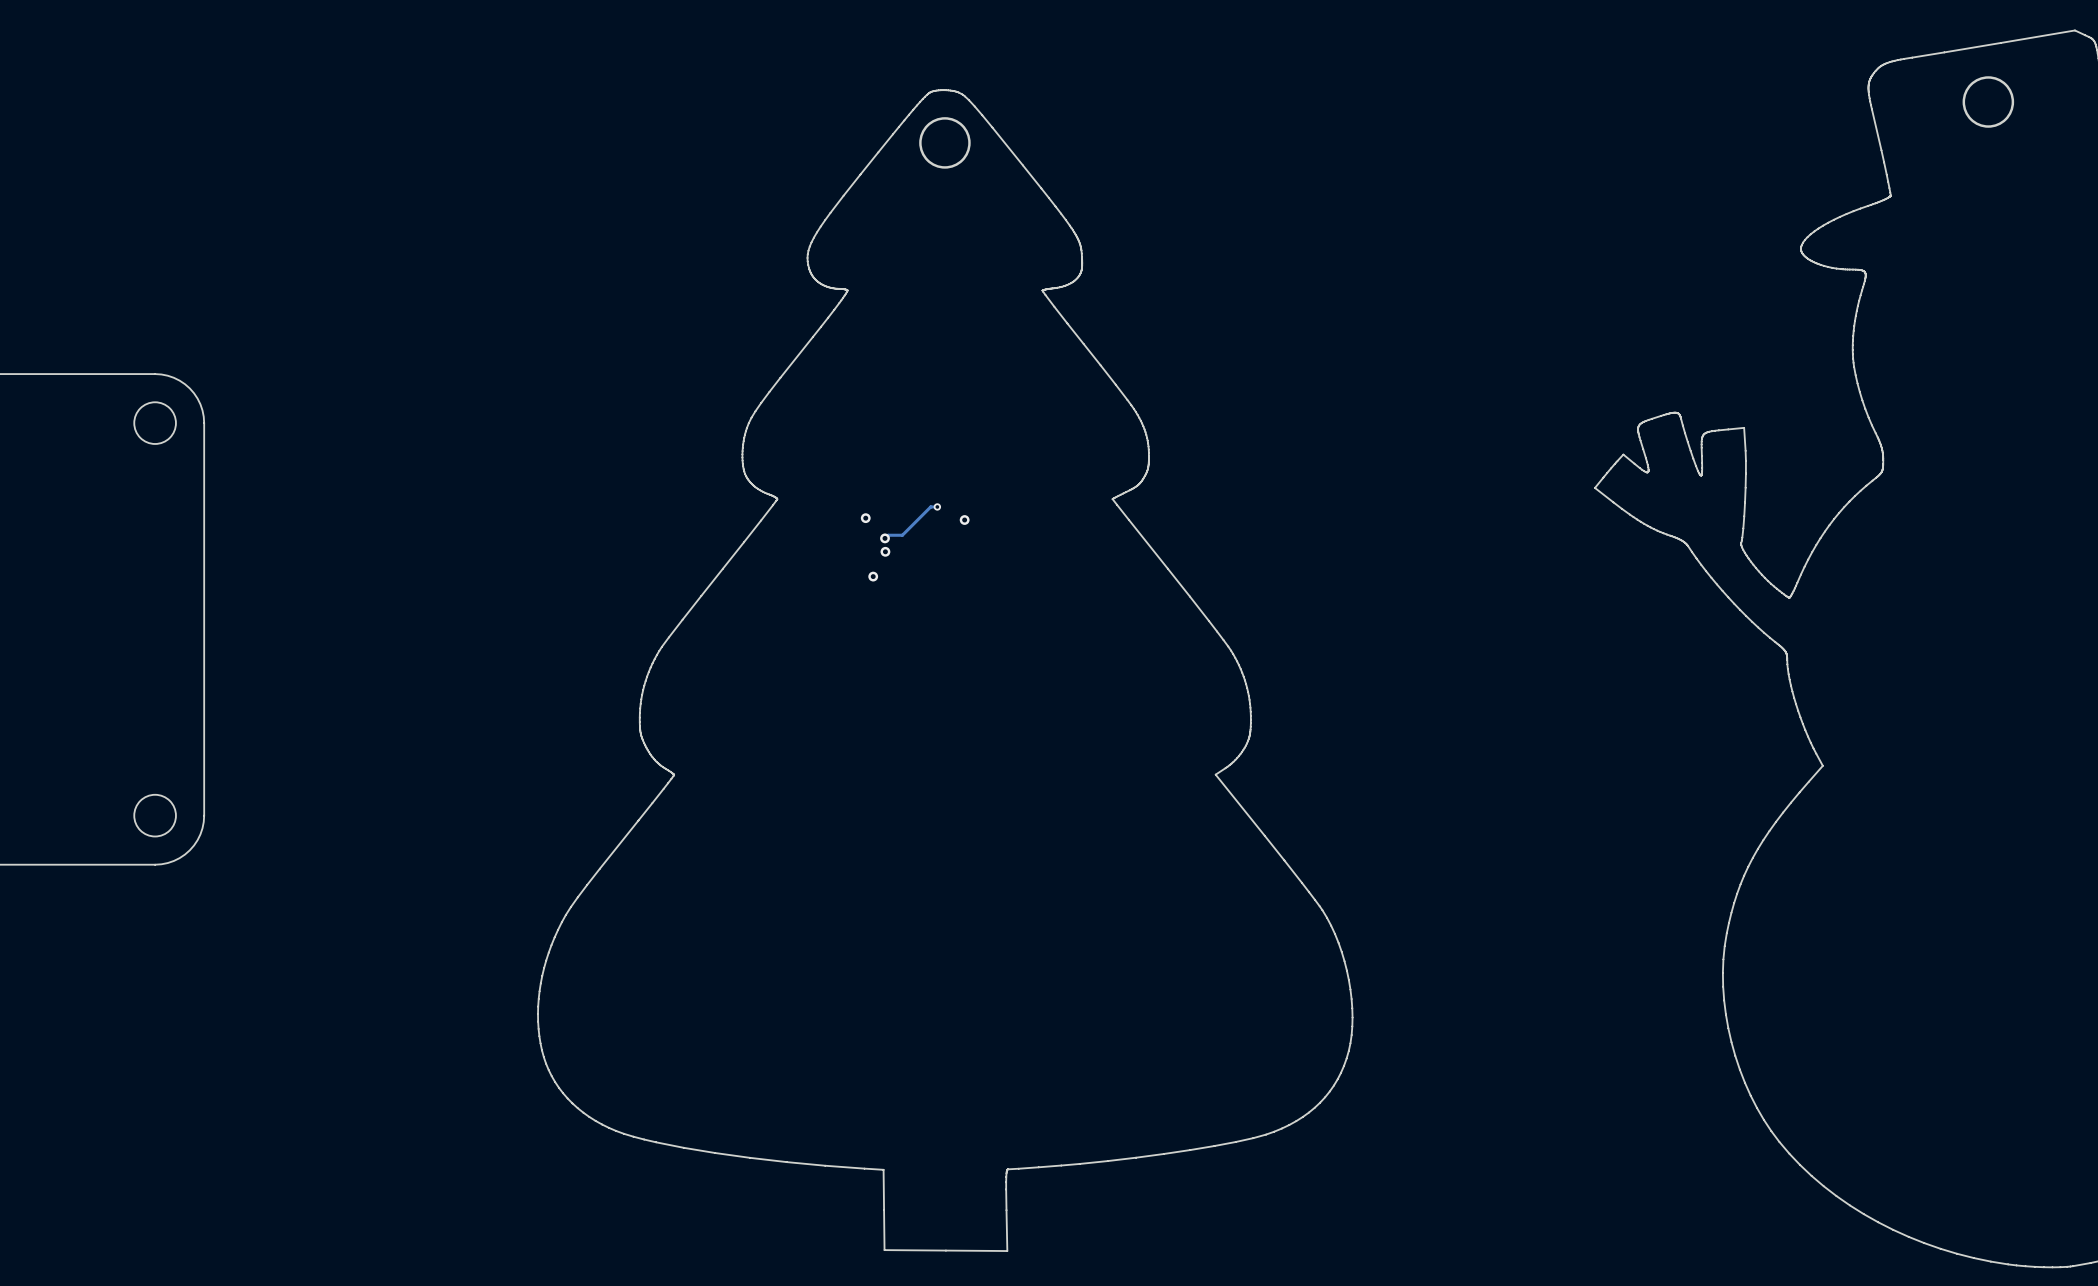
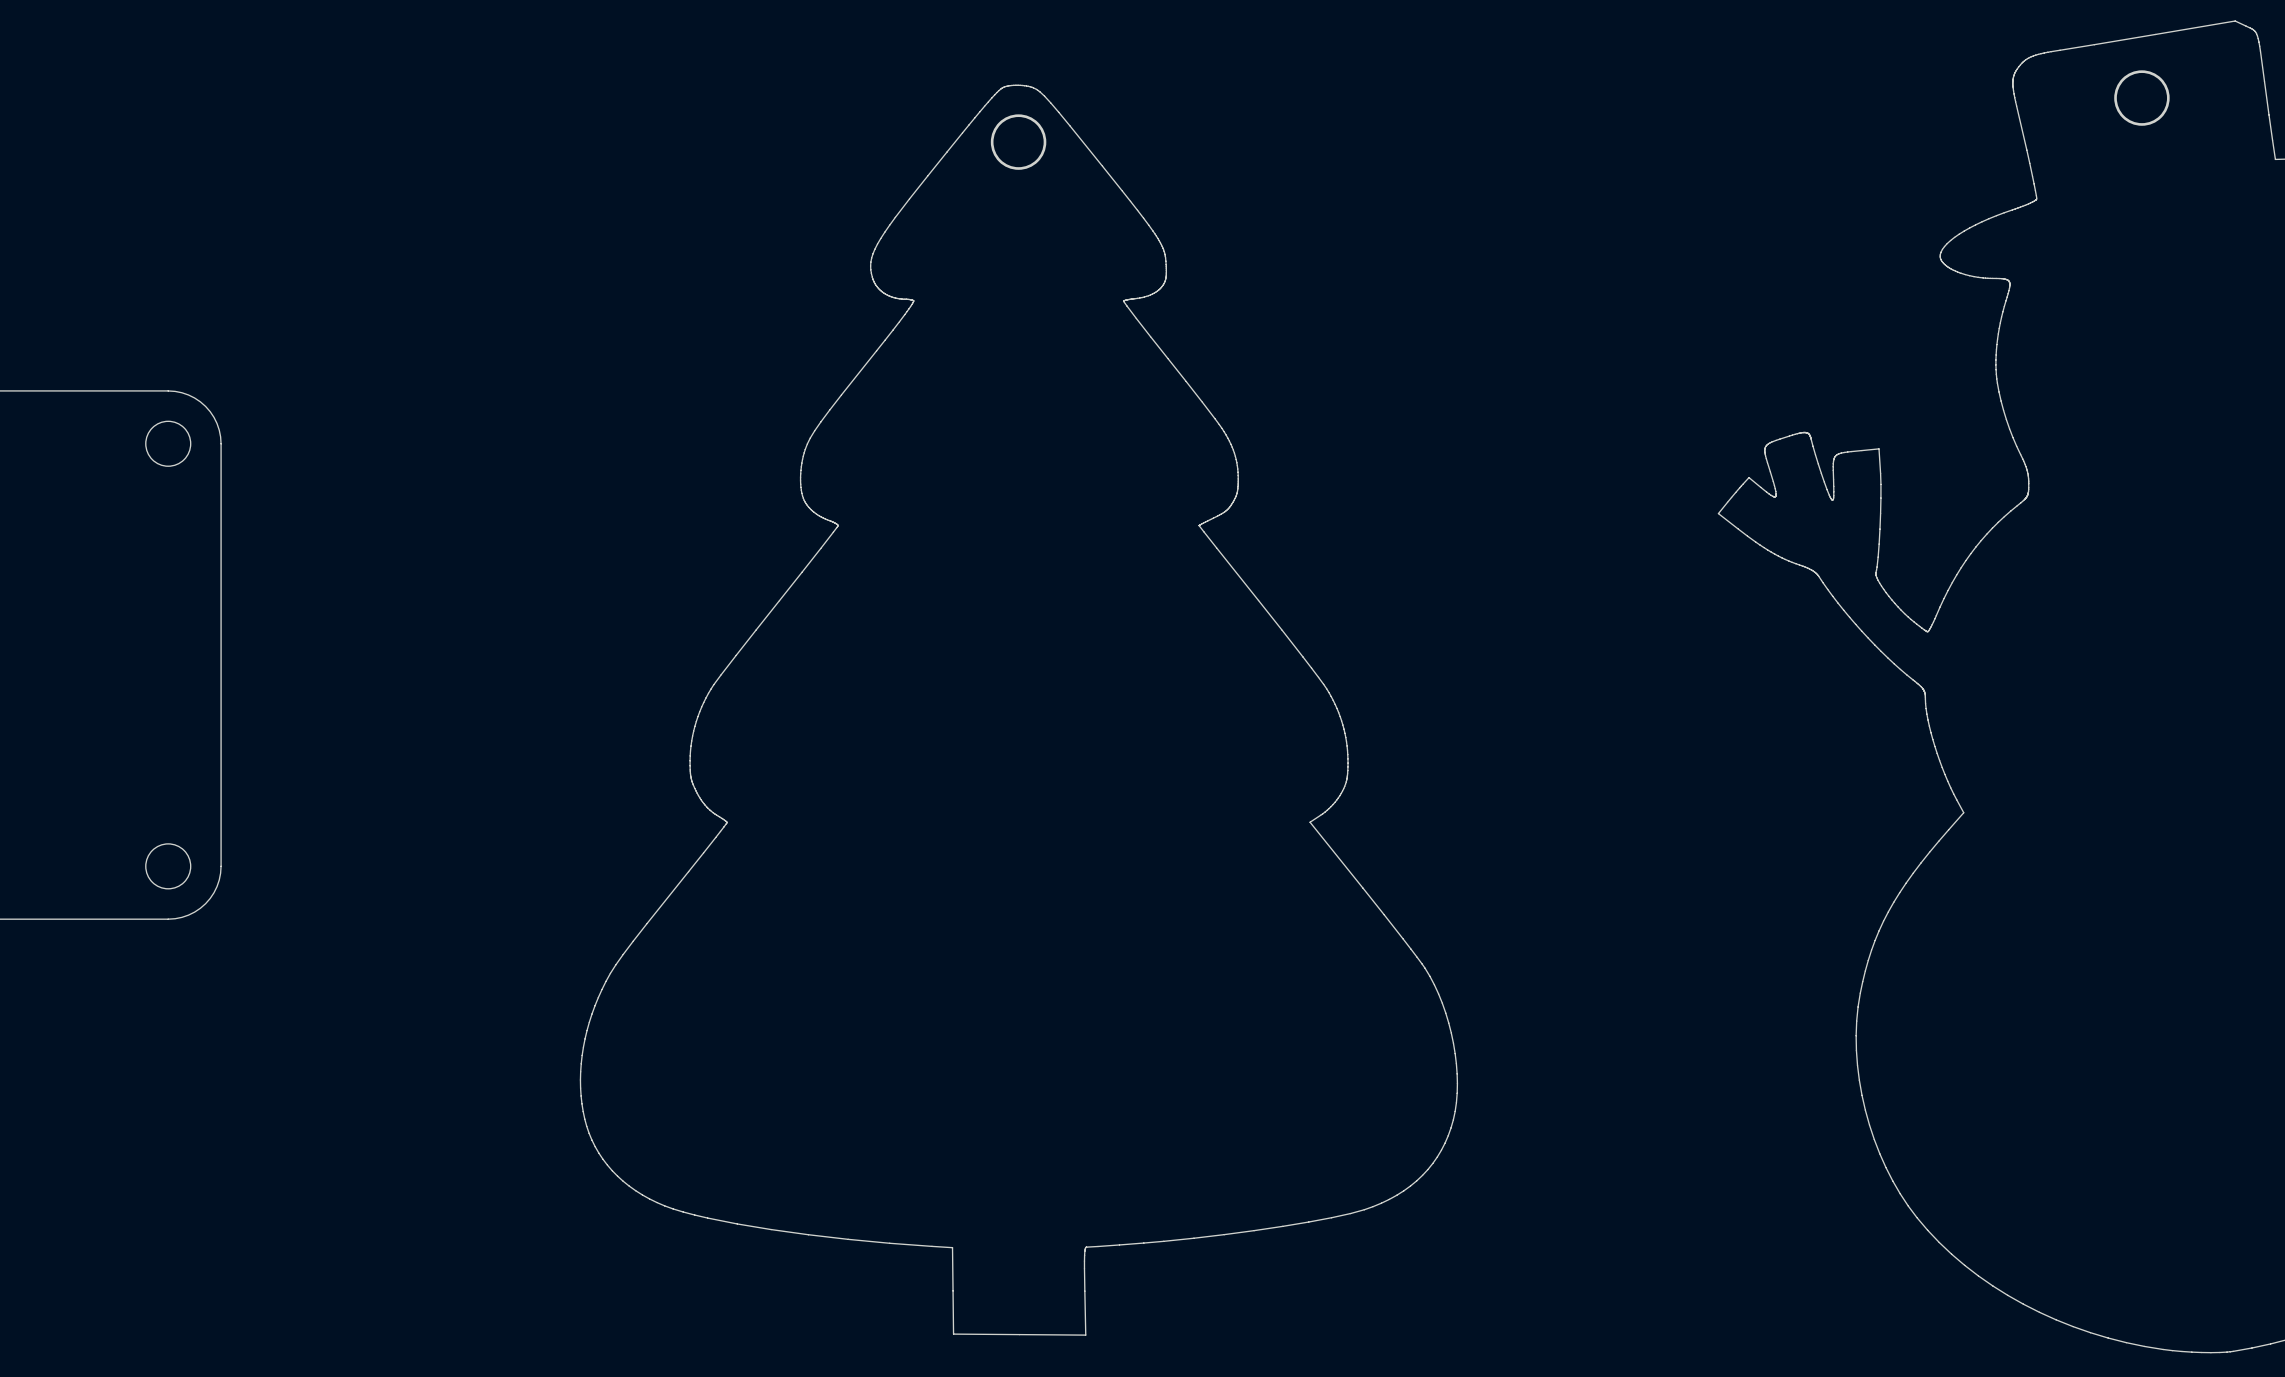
track: (937, 506) (930, 506) (902, 535) (888, 535) (885, 538) -> none
via: (937, 506) -> none
via: (865, 518) -> none
via: (964, 520) -> none
via: (885, 538) -> none
via: (885, 551) -> none
via: (873, 576) -> none

